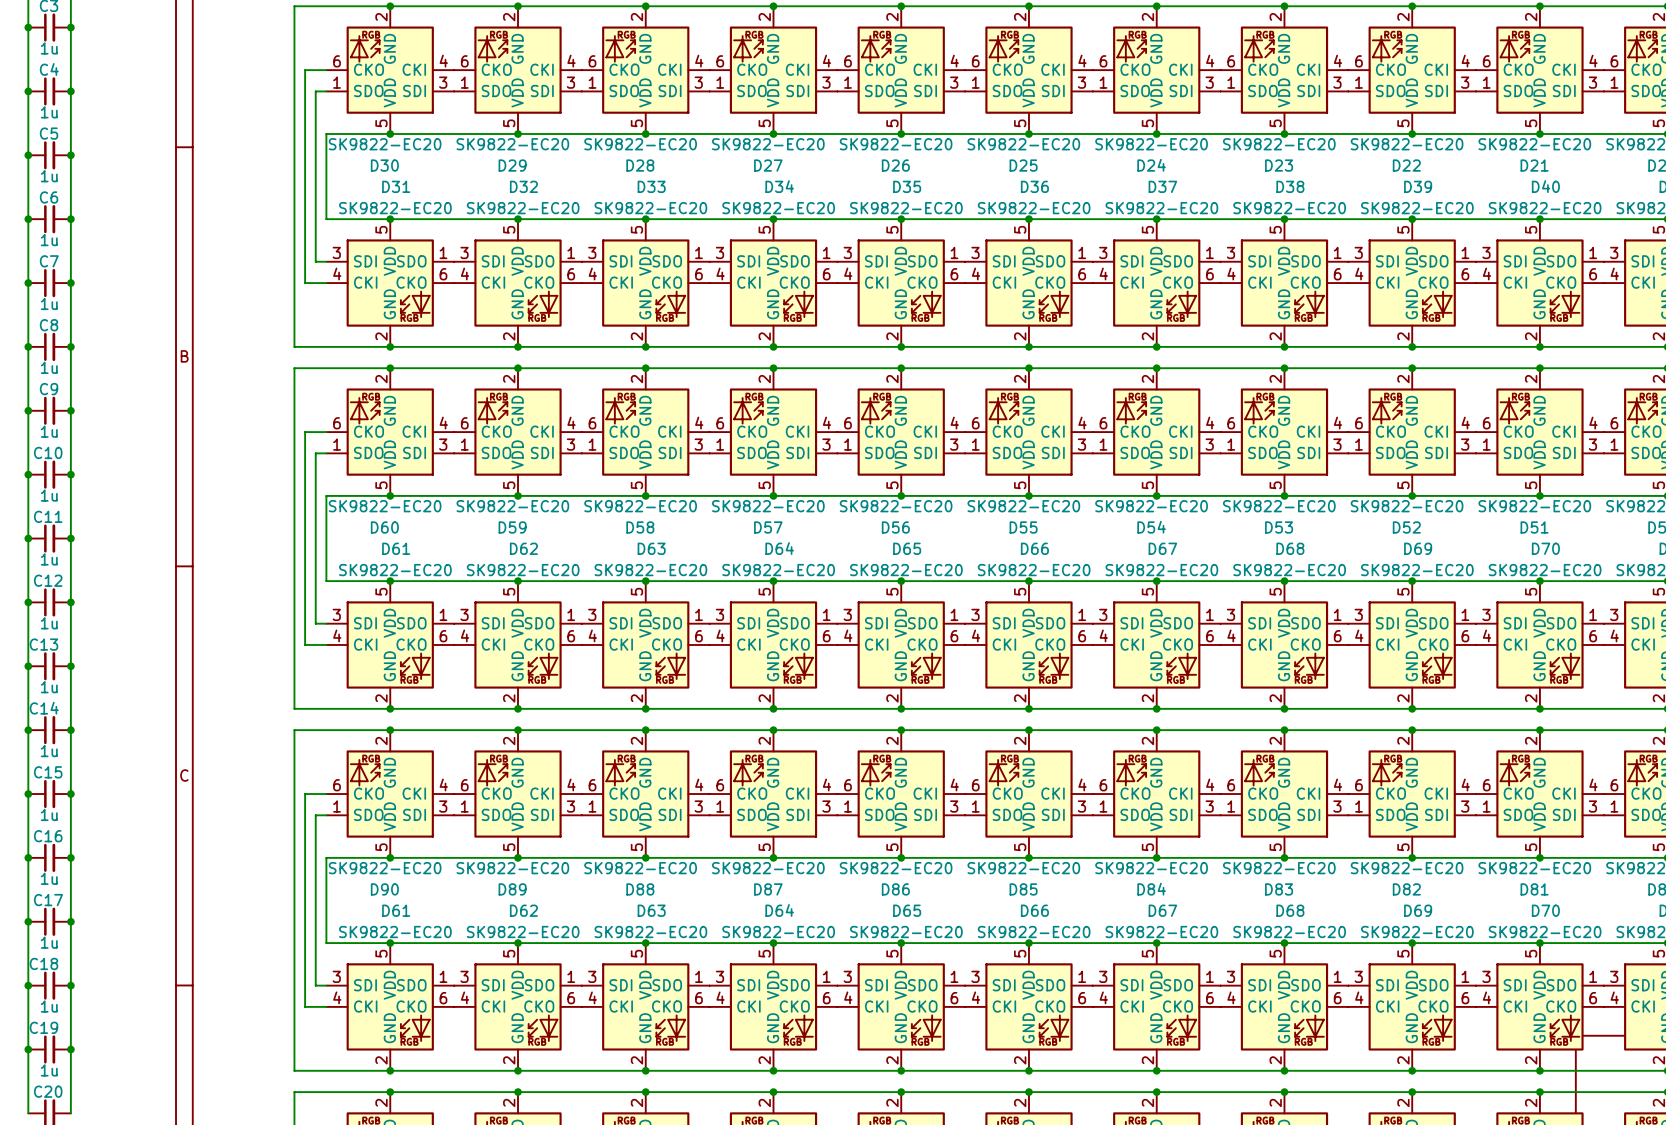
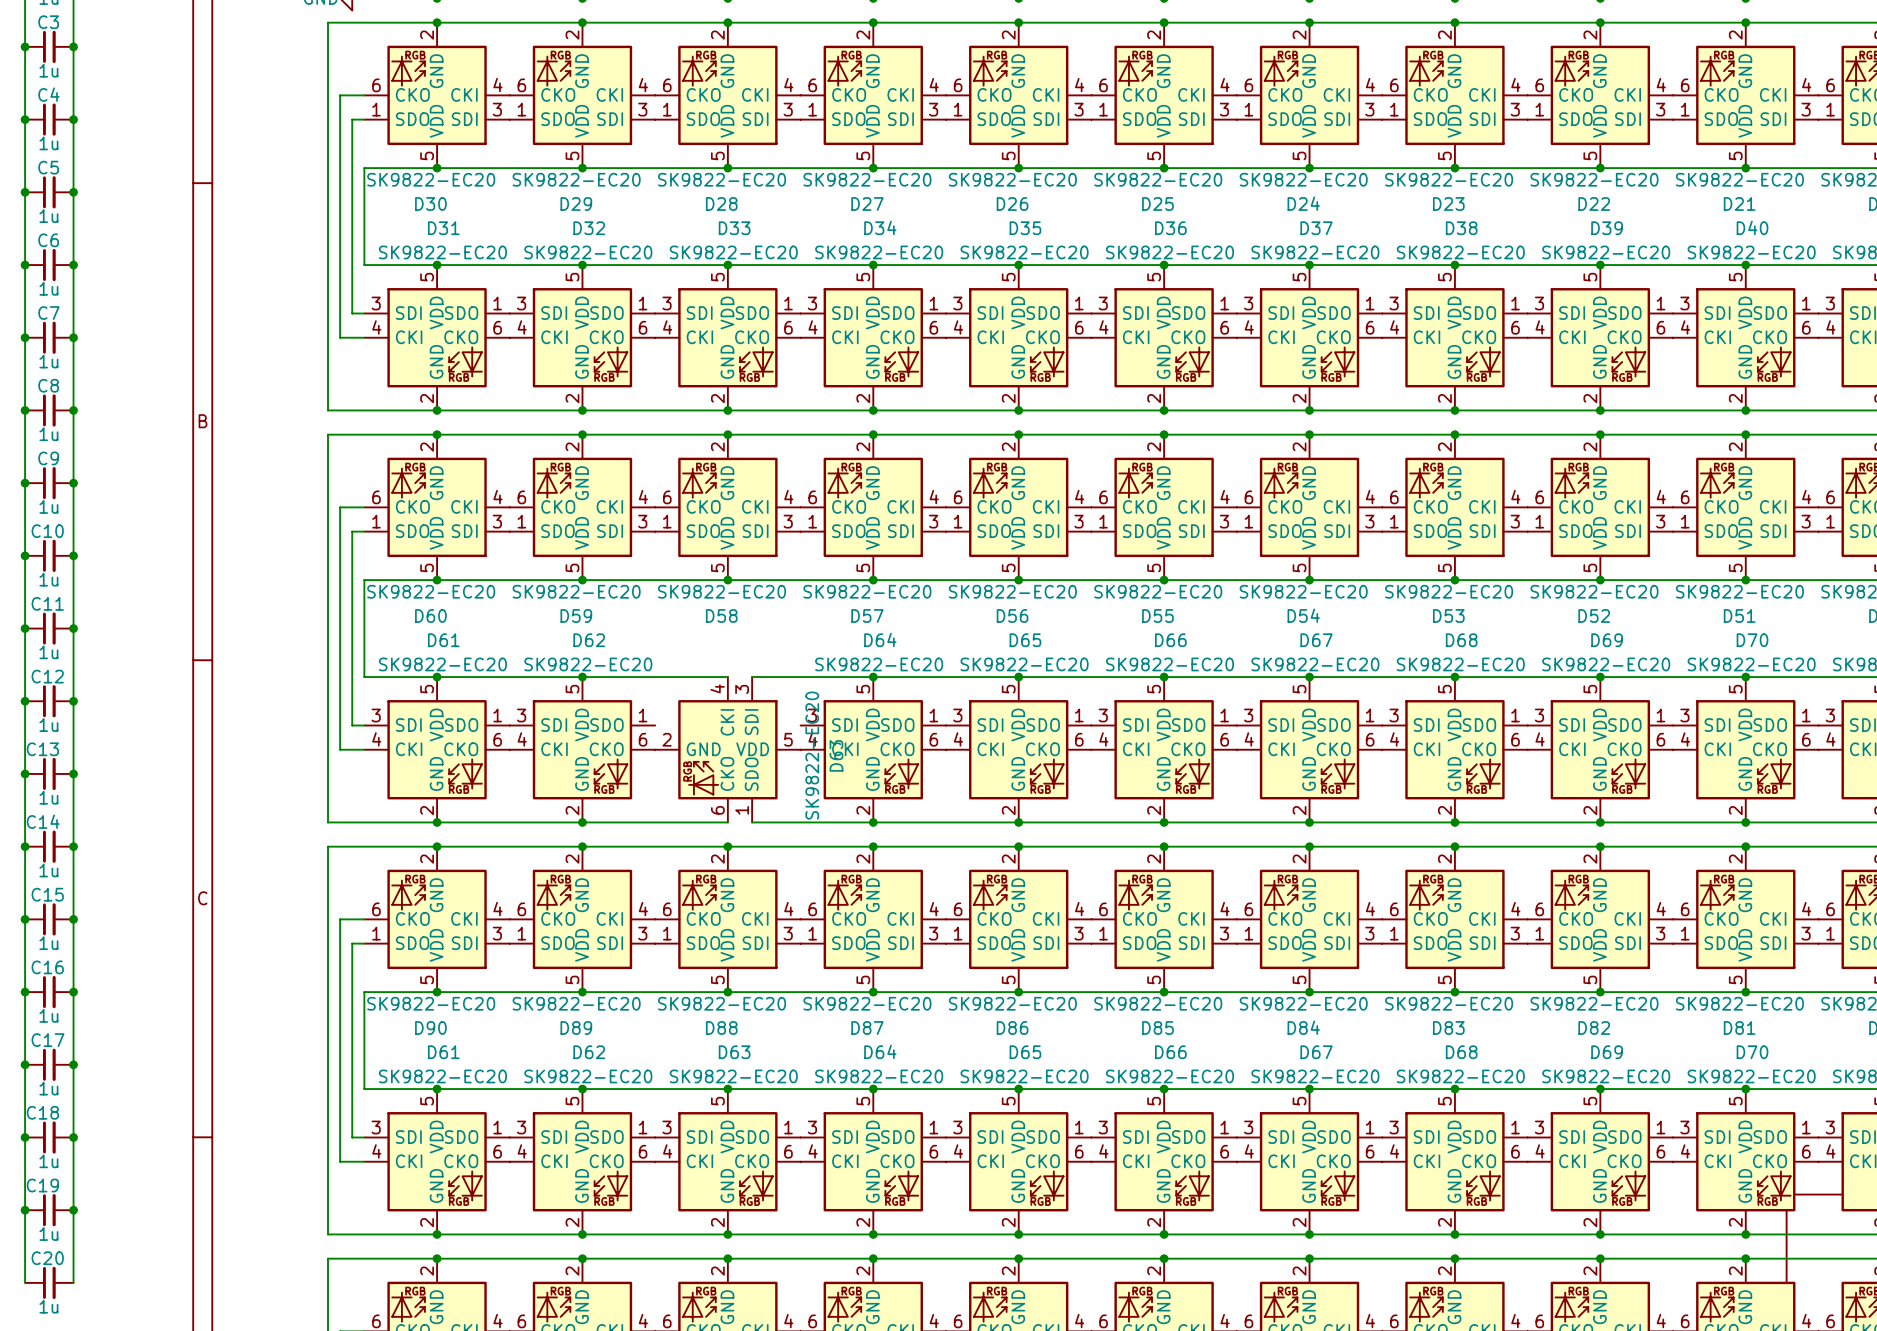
wire: (645, 581) (667, 581) -> none
junction: (645, 581) -> none
D63 rotation: 0° (645, 644) -> 90° clockwise (727, 749)
wire: (645, 708) (667, 708) -> none
junction: (645, 708) -> none

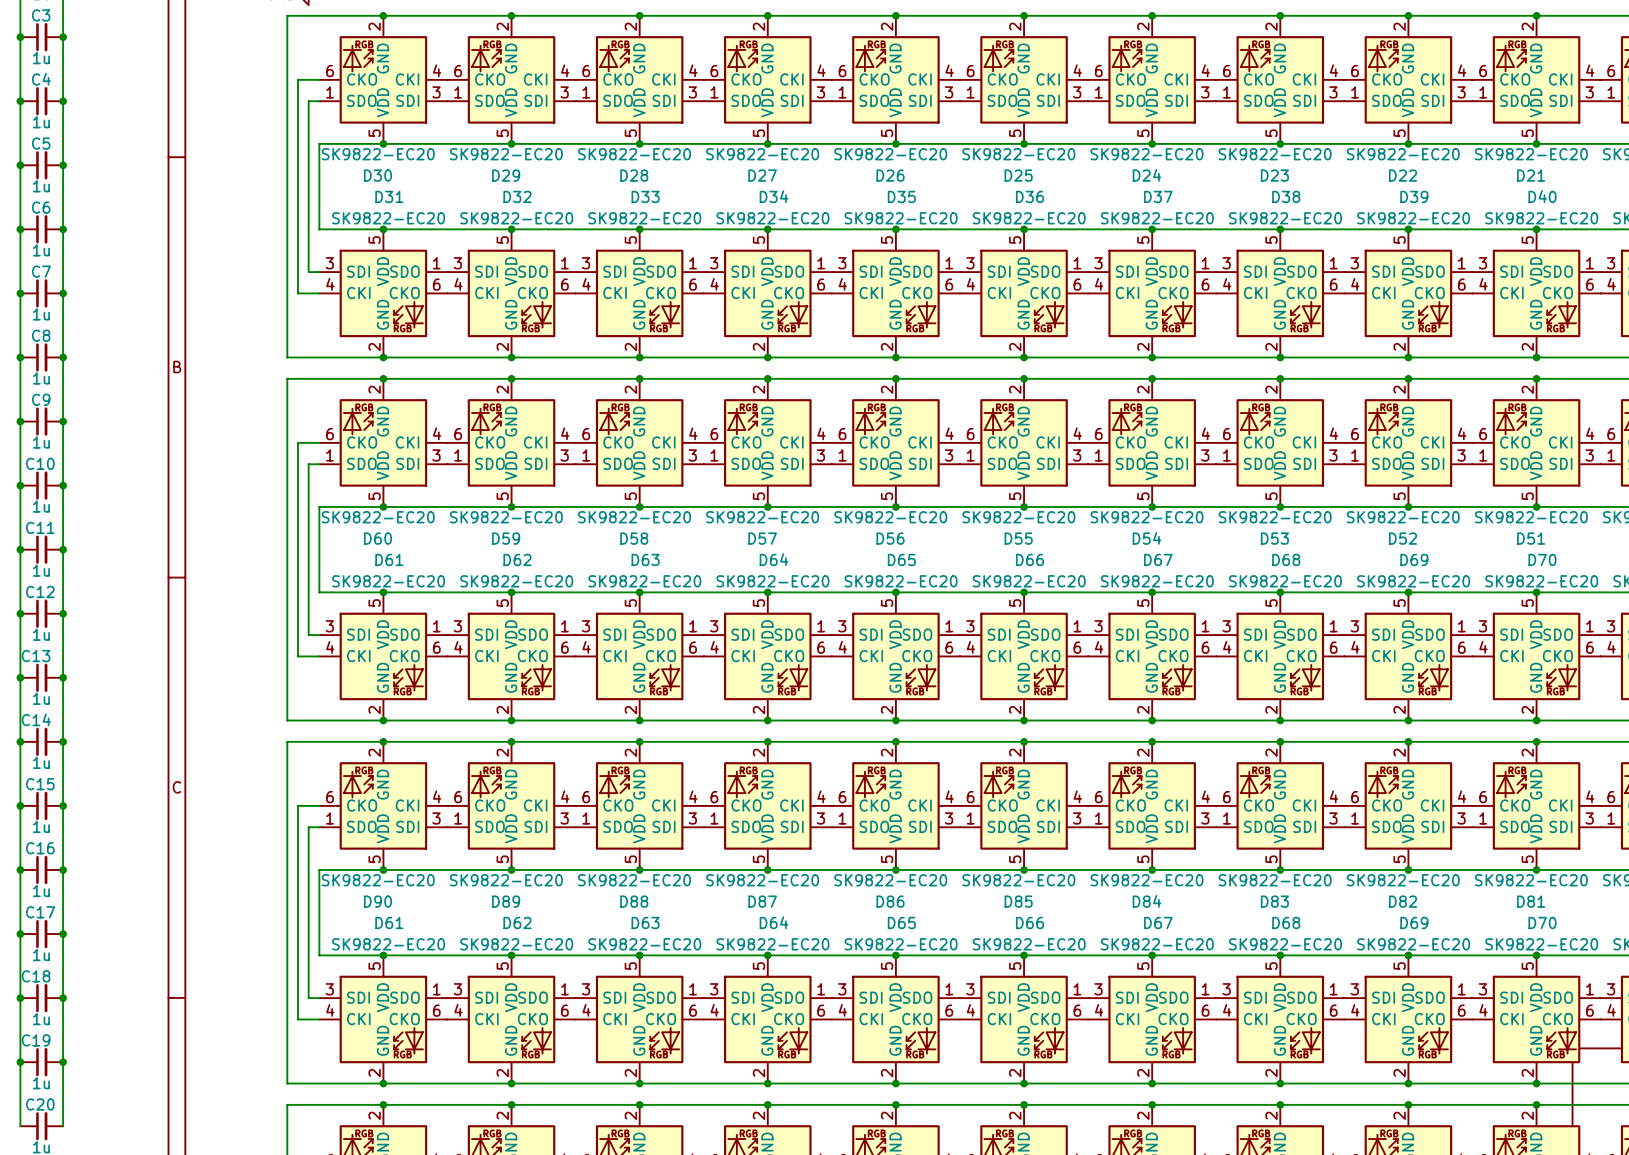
wire: none -> (639, 592) (661, 592)
junction: none -> (639, 592)
D63 rotation: 0° (727, 749) -> 90° counterclockwise (639, 656)
wire: none -> (639, 720) (661, 720)
junction: none -> (639, 720)

